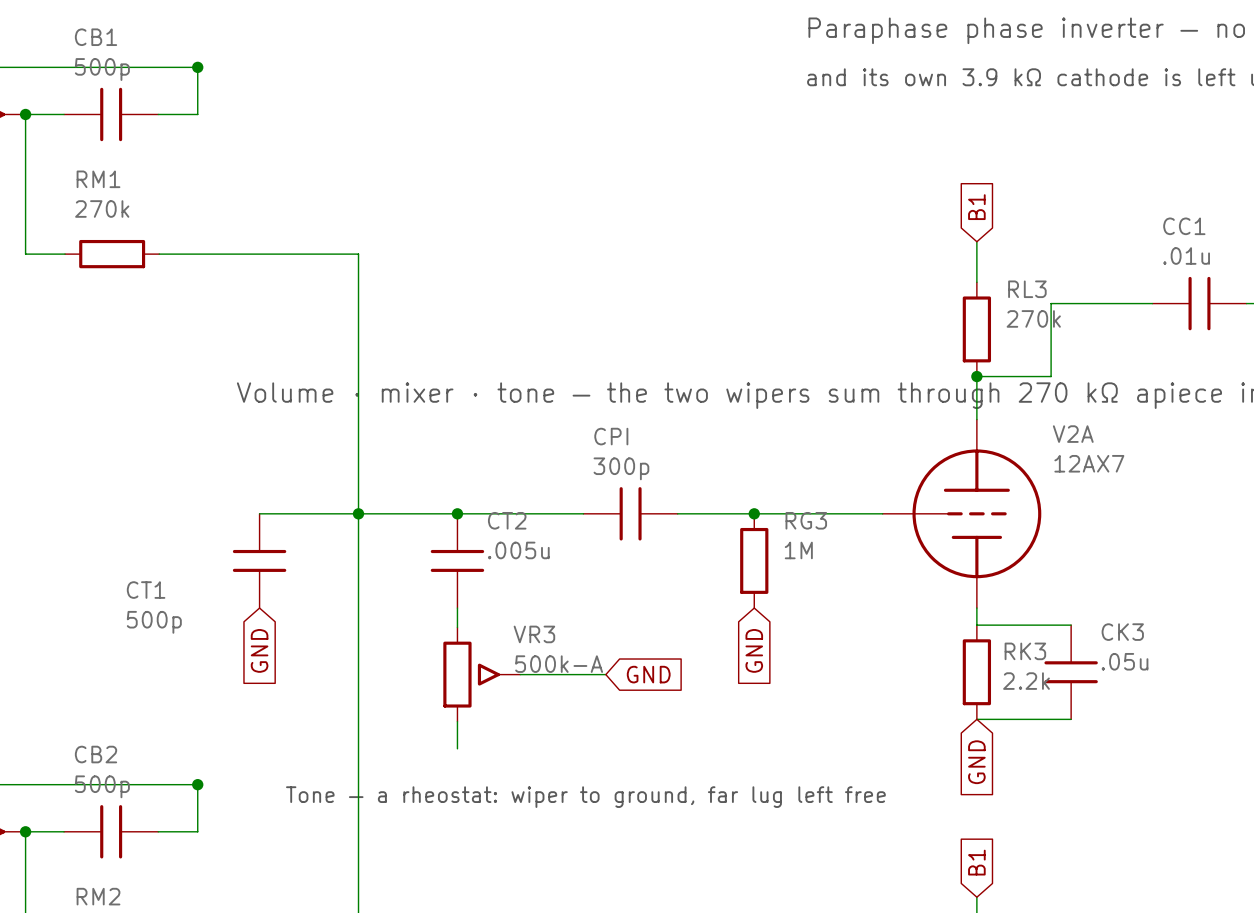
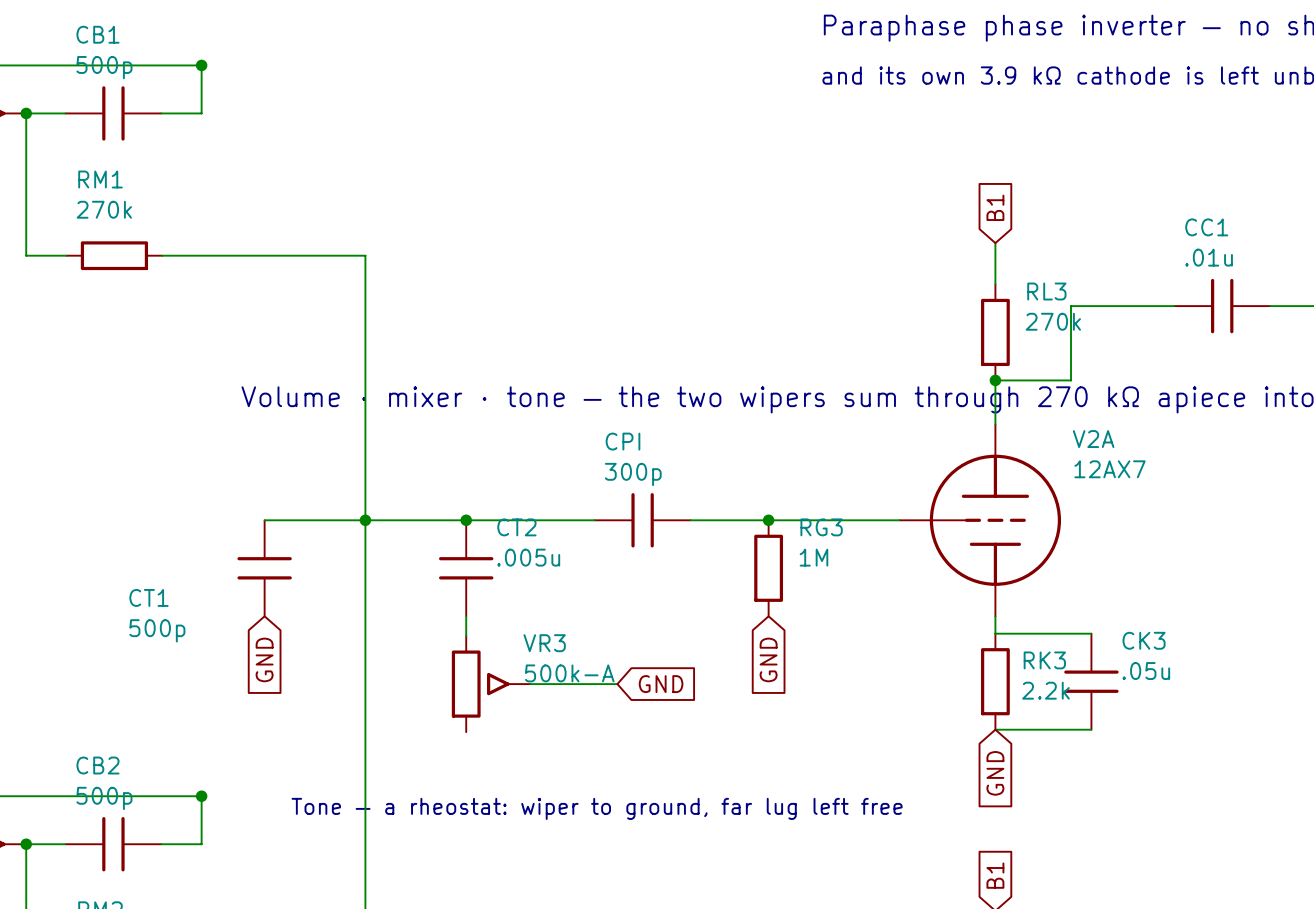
wire: (457, 721) (457, 748) -> none

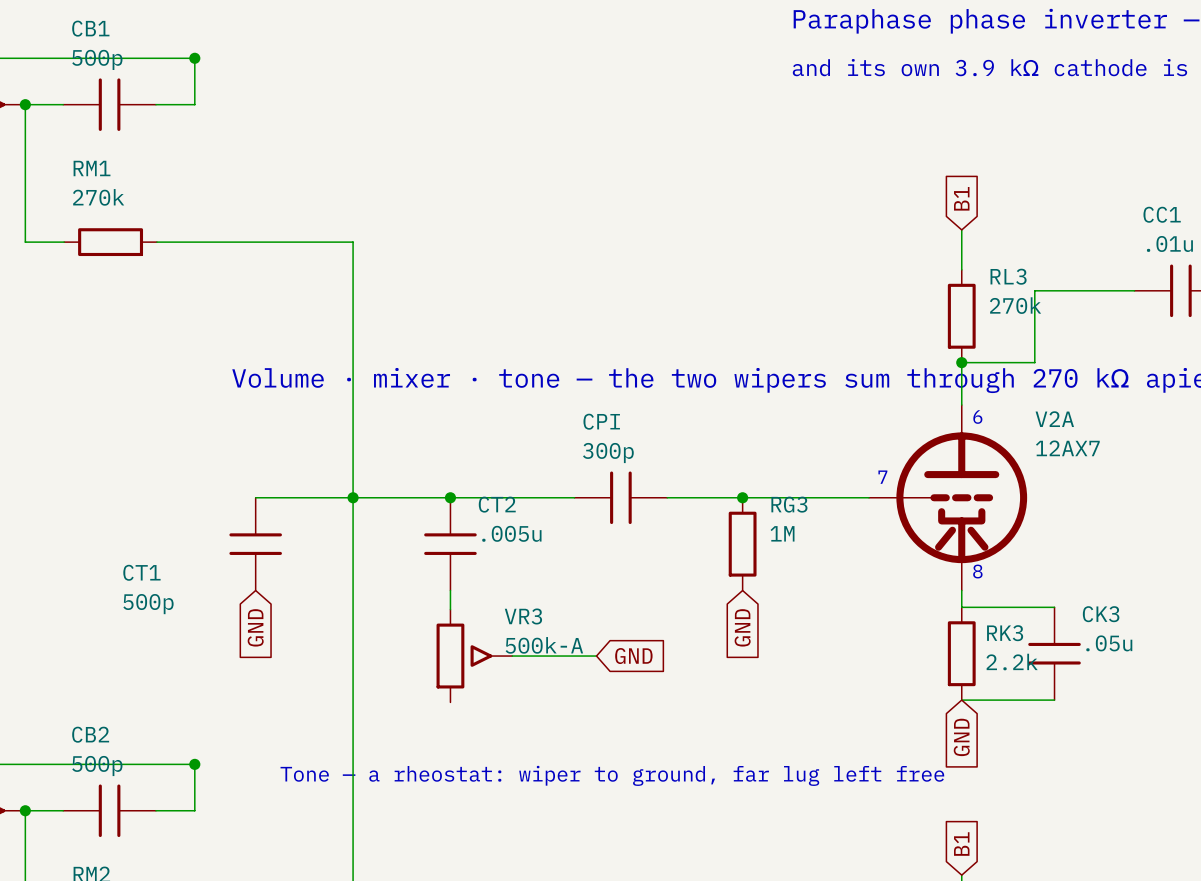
V2A symbol: [899, 424, 1062, 617] -> [868, 405, 1028, 591]
text: none -> 6 (977, 417)
text: none -> 7 (882, 477)
text: none -> 8 (977, 571)

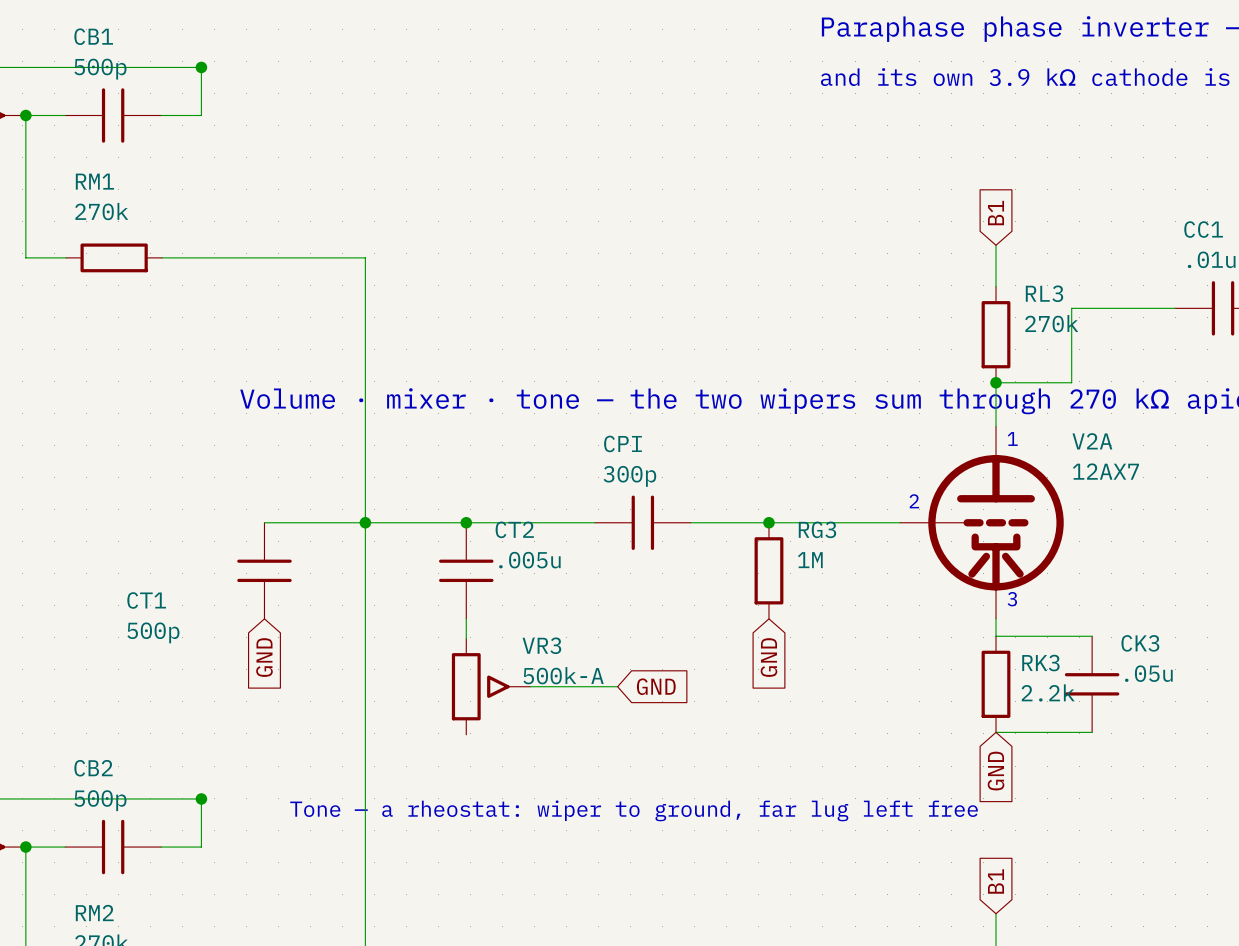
text: 6 (977, 417) -> 1 (1012, 439)
text: 7 (882, 477) -> 2 (914, 501)
text: 8 (977, 571) -> 3 (1012, 599)

